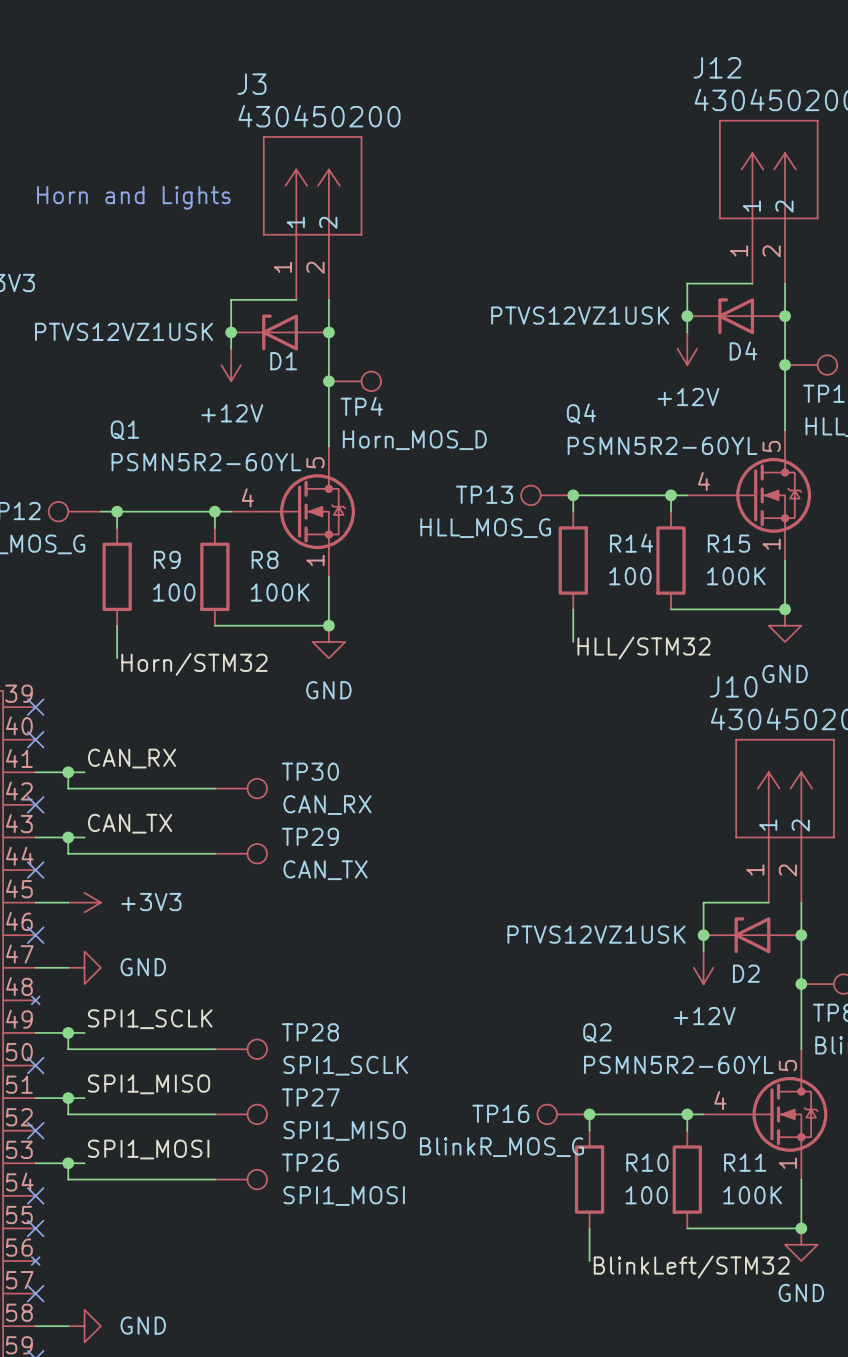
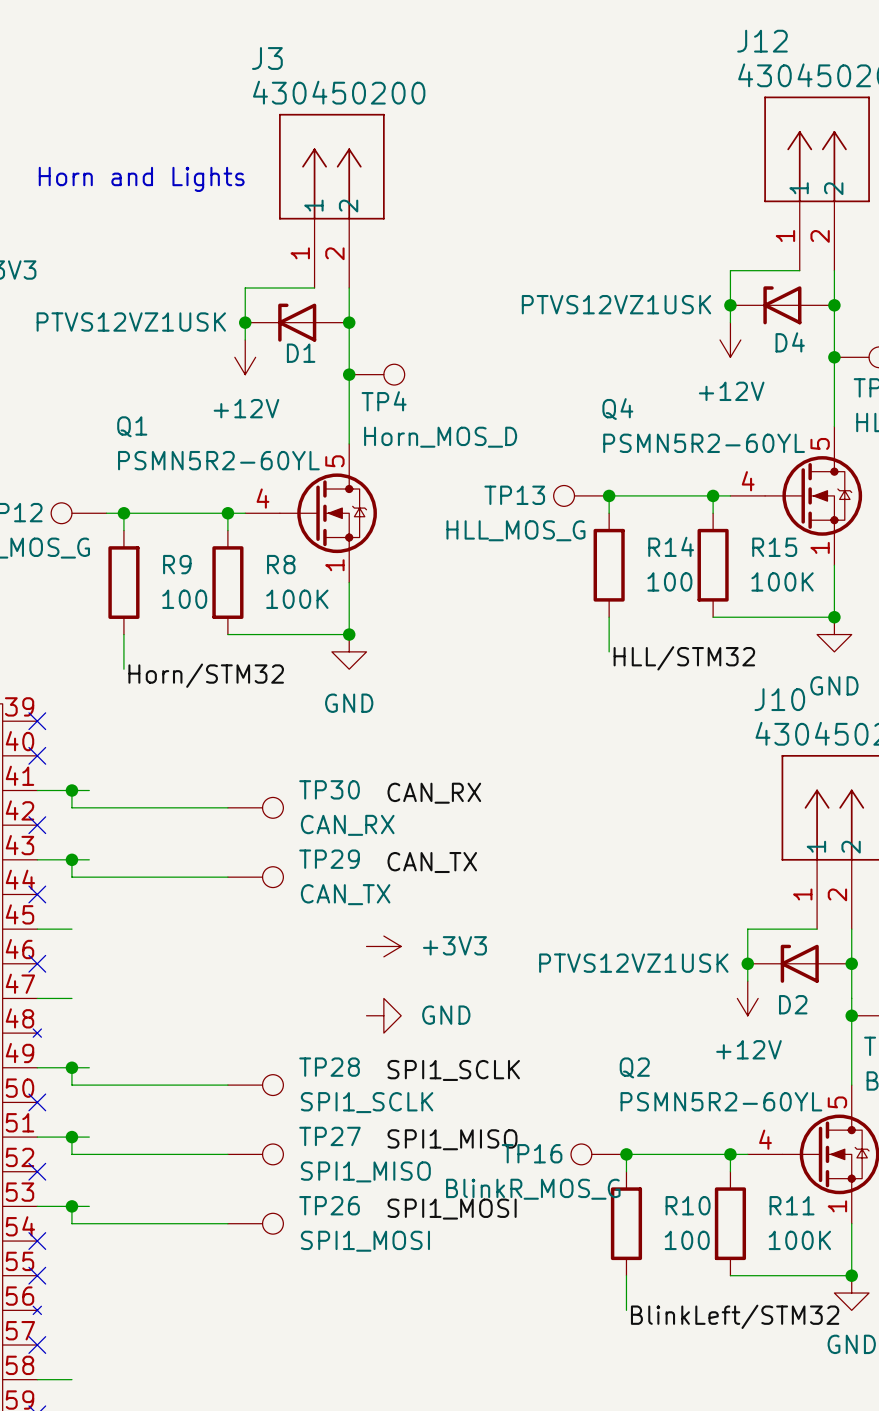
label position: CAN_RX (132, 758) -> CAN_RX (434, 793)
label position: CAN_TX (130, 823) -> CAN_TX (432, 862)
power symbol: +3V3 (84, 902) -> none
power symbol: none -> +3V3 (383, 946)
power symbol: GND (84, 967) -> none
power symbol: none -> GND (383, 1015)
label position: SPI1_SCLK (150, 1019) -> SPI1_SCLK (453, 1070)
label position: SPI1_MISO (149, 1084) -> SPI1_MISO (452, 1139)
label position: SPI1_MOSI (148, 1149) -> SPI1_MOSI (452, 1209)
power symbol: GND (84, 1326) -> none

